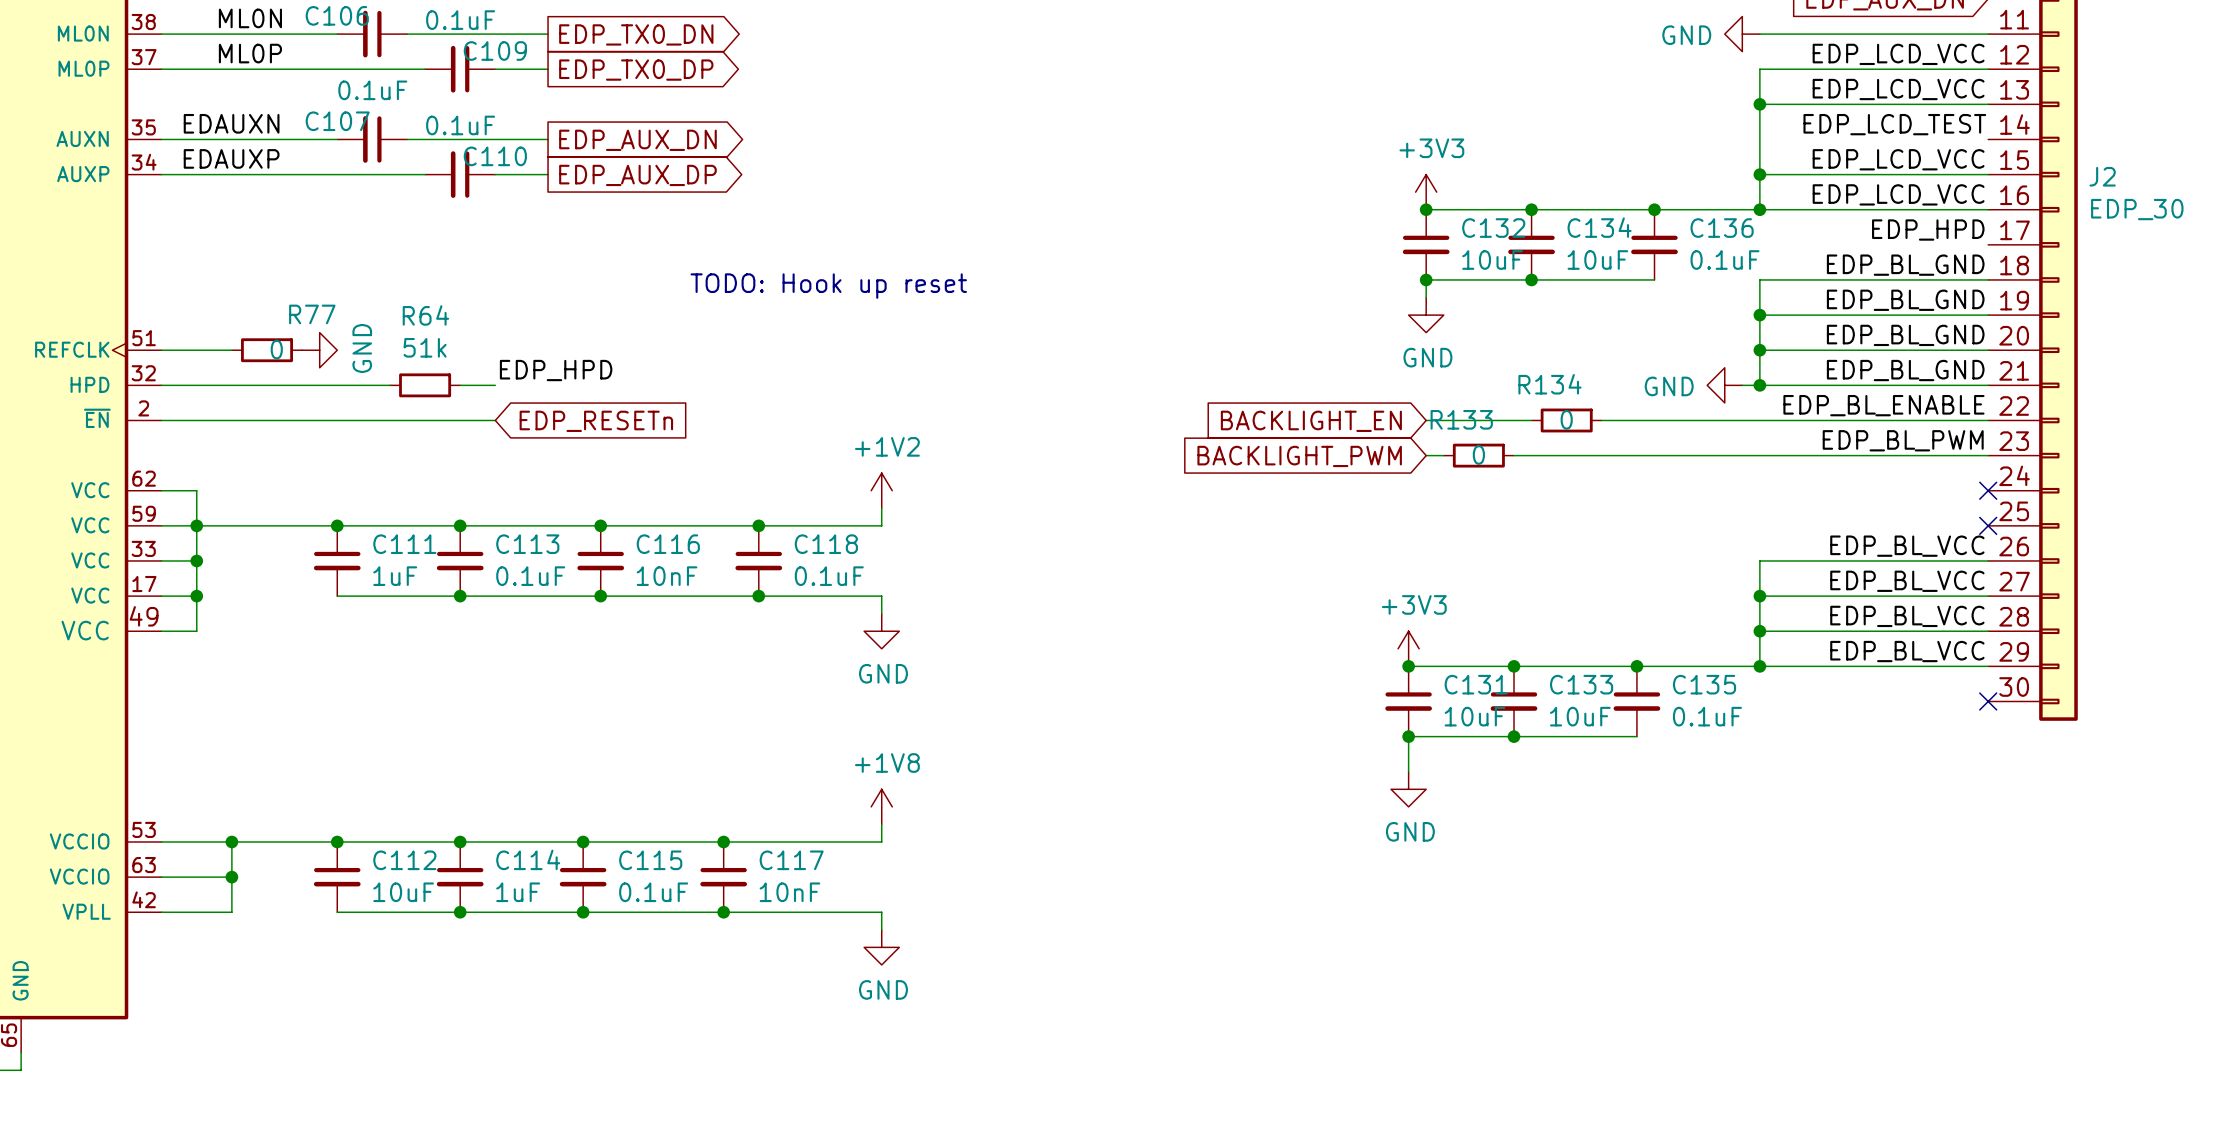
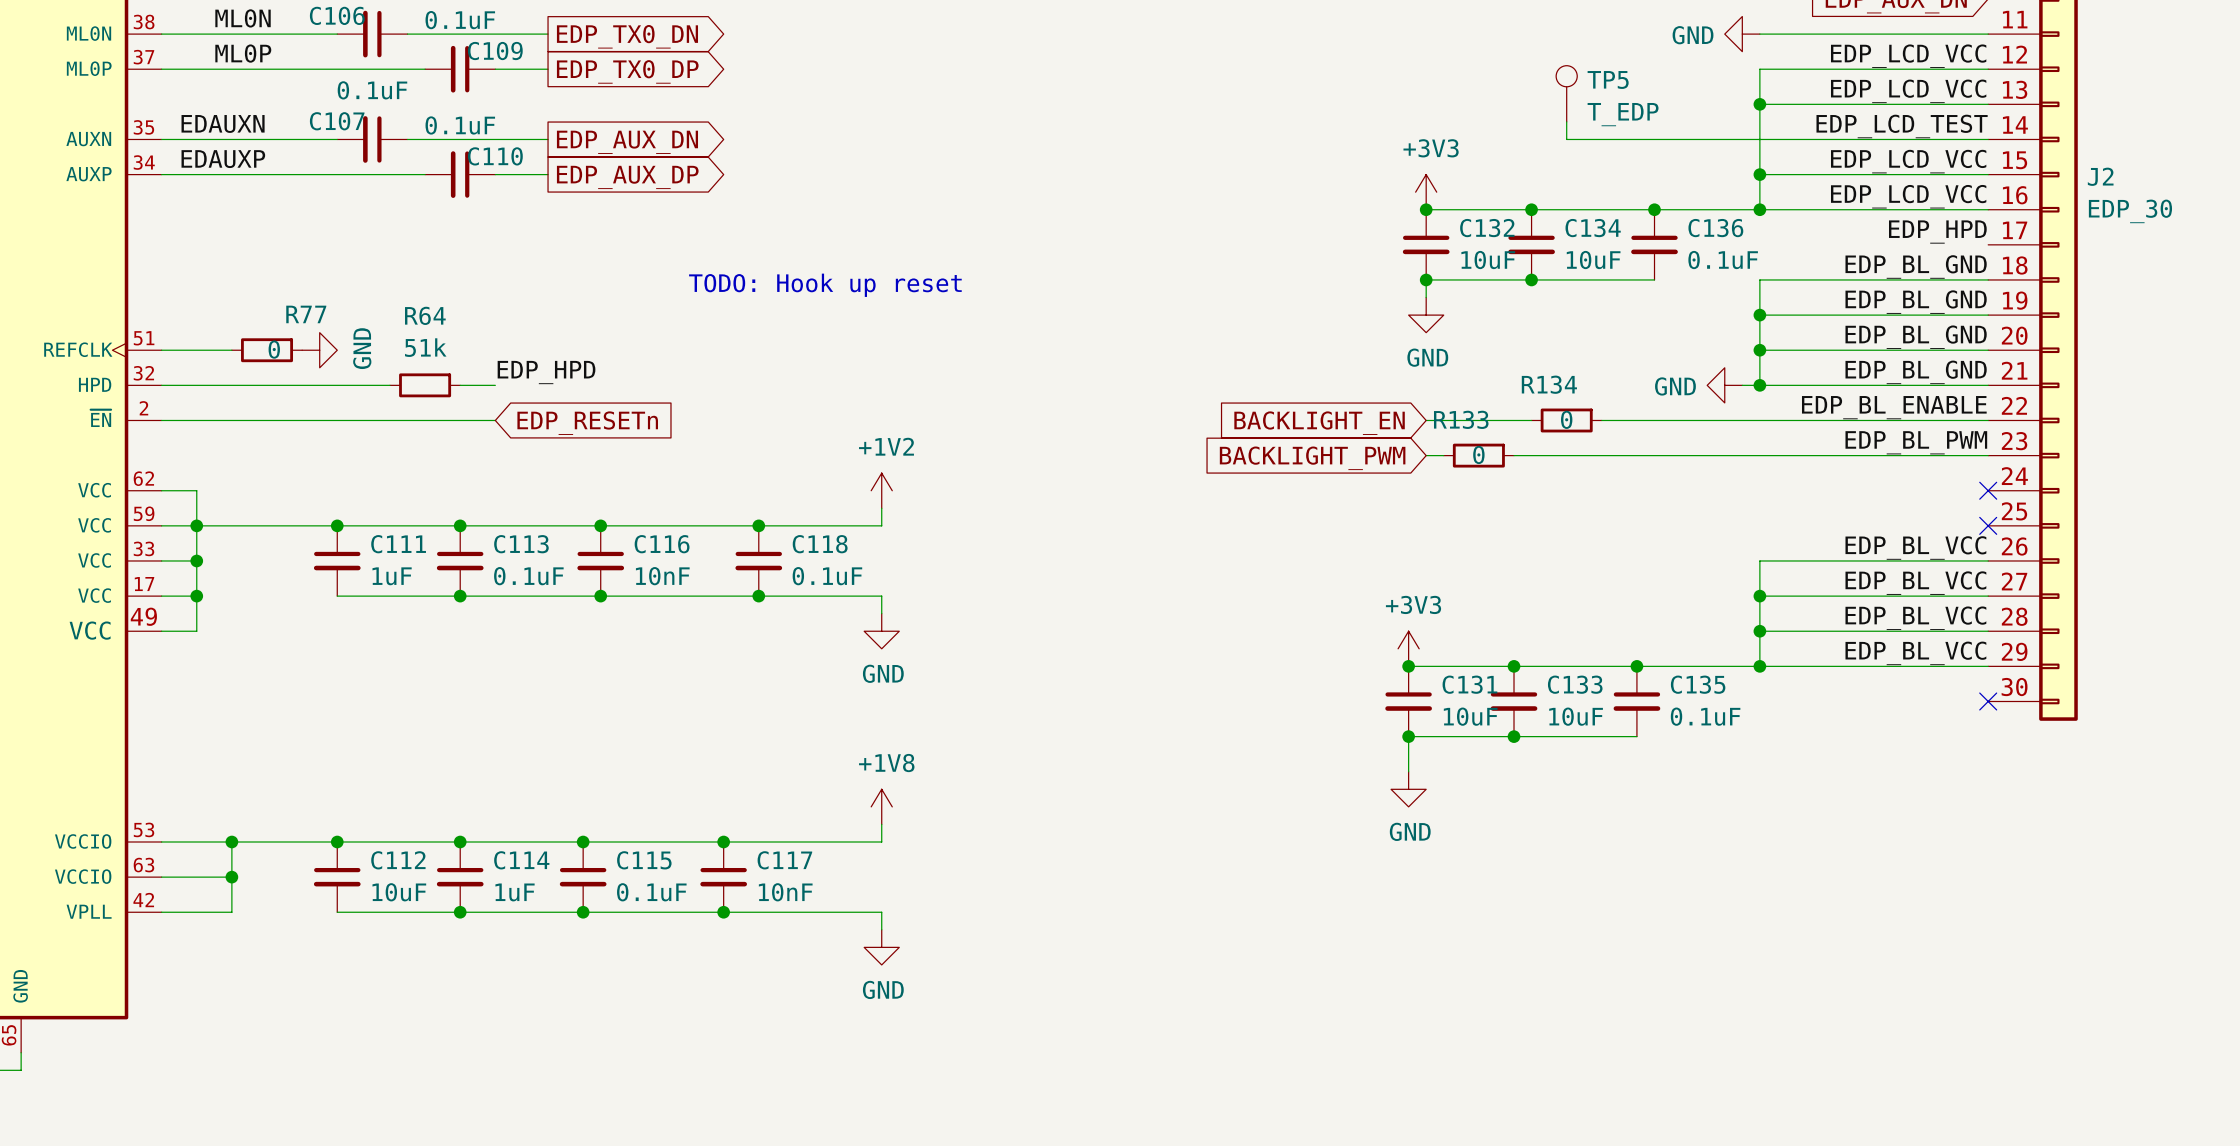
TP5: none -> T_EDP (1566, 93)
wire: none -> (1566, 121) (1566, 139) (1988, 139)

